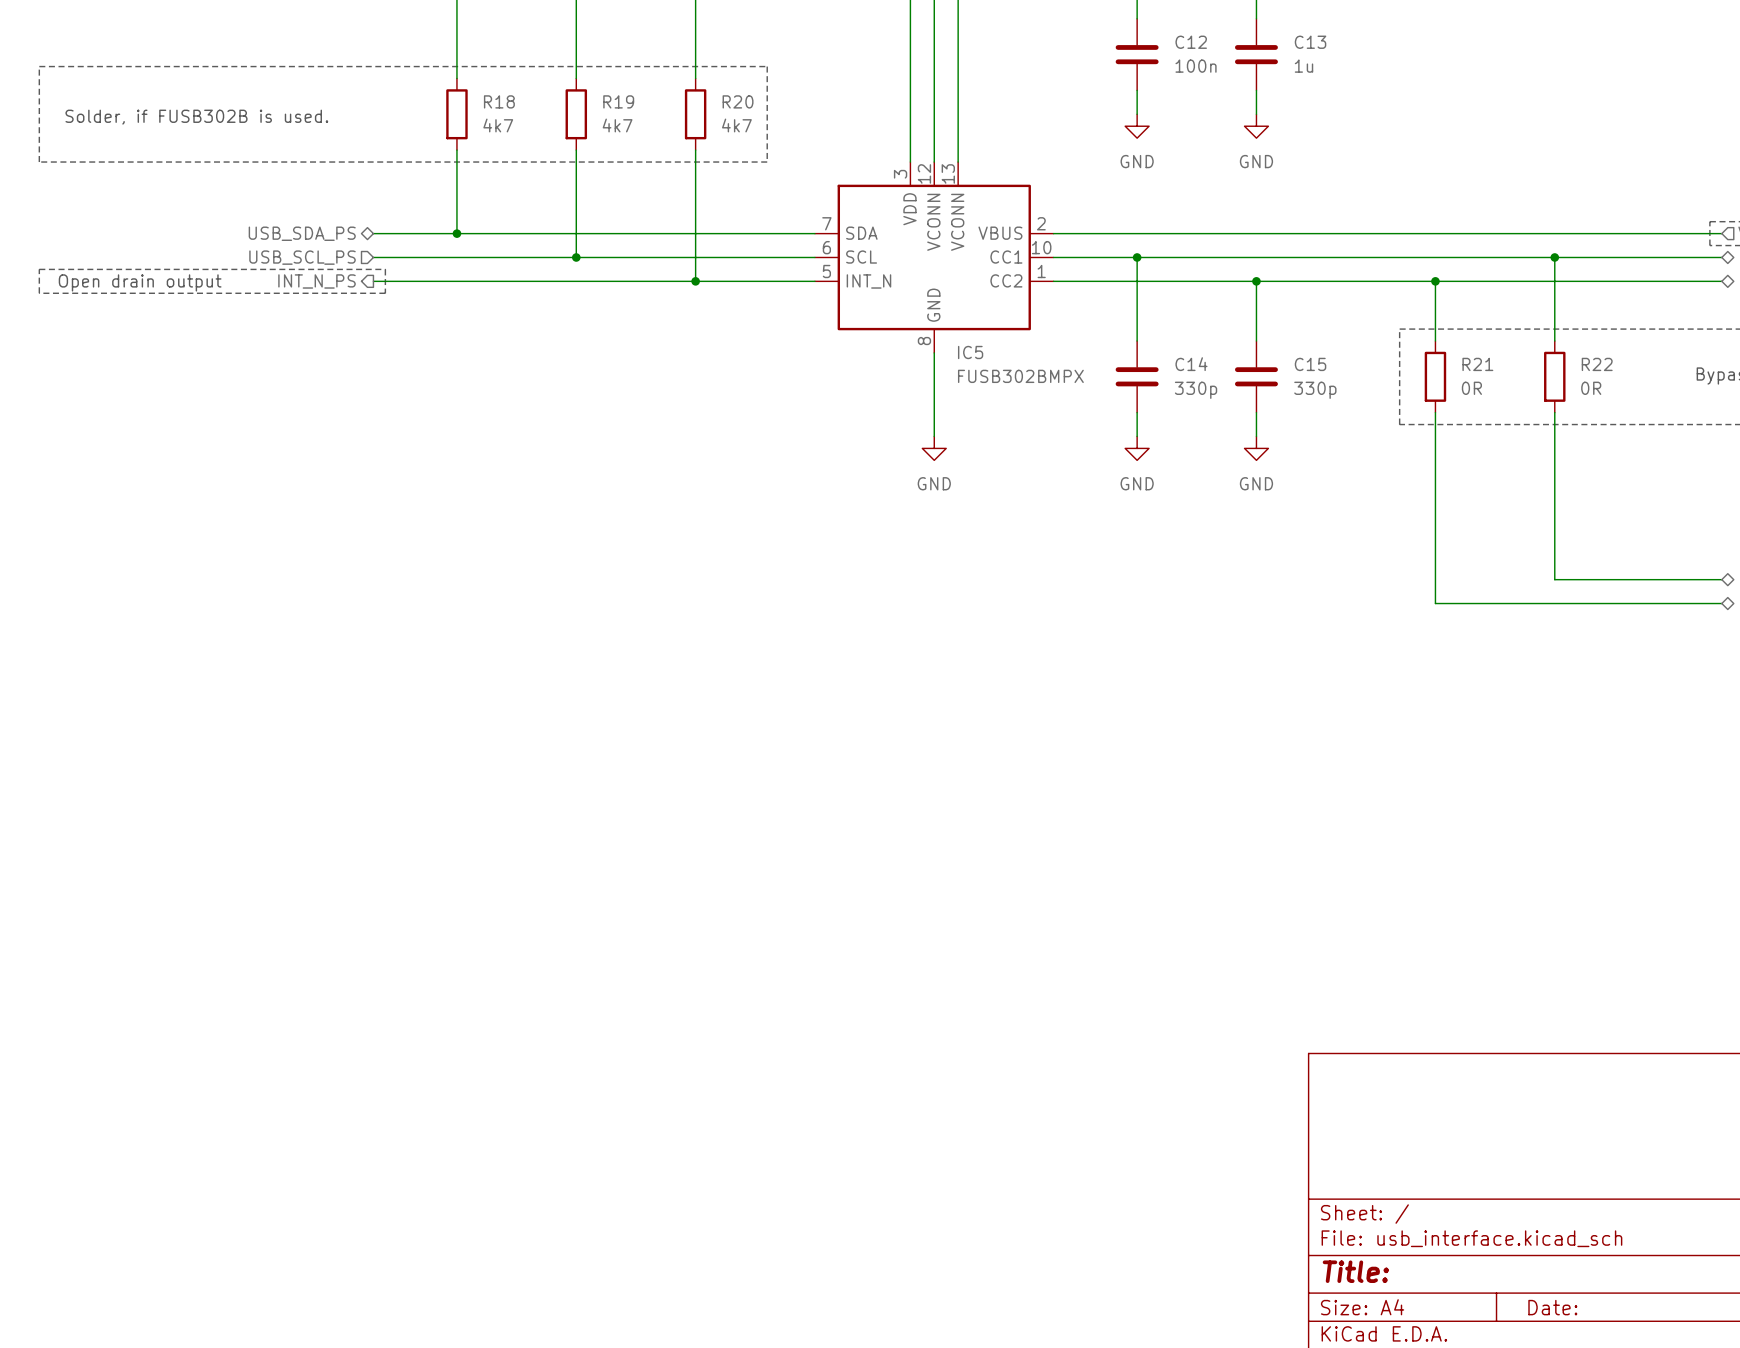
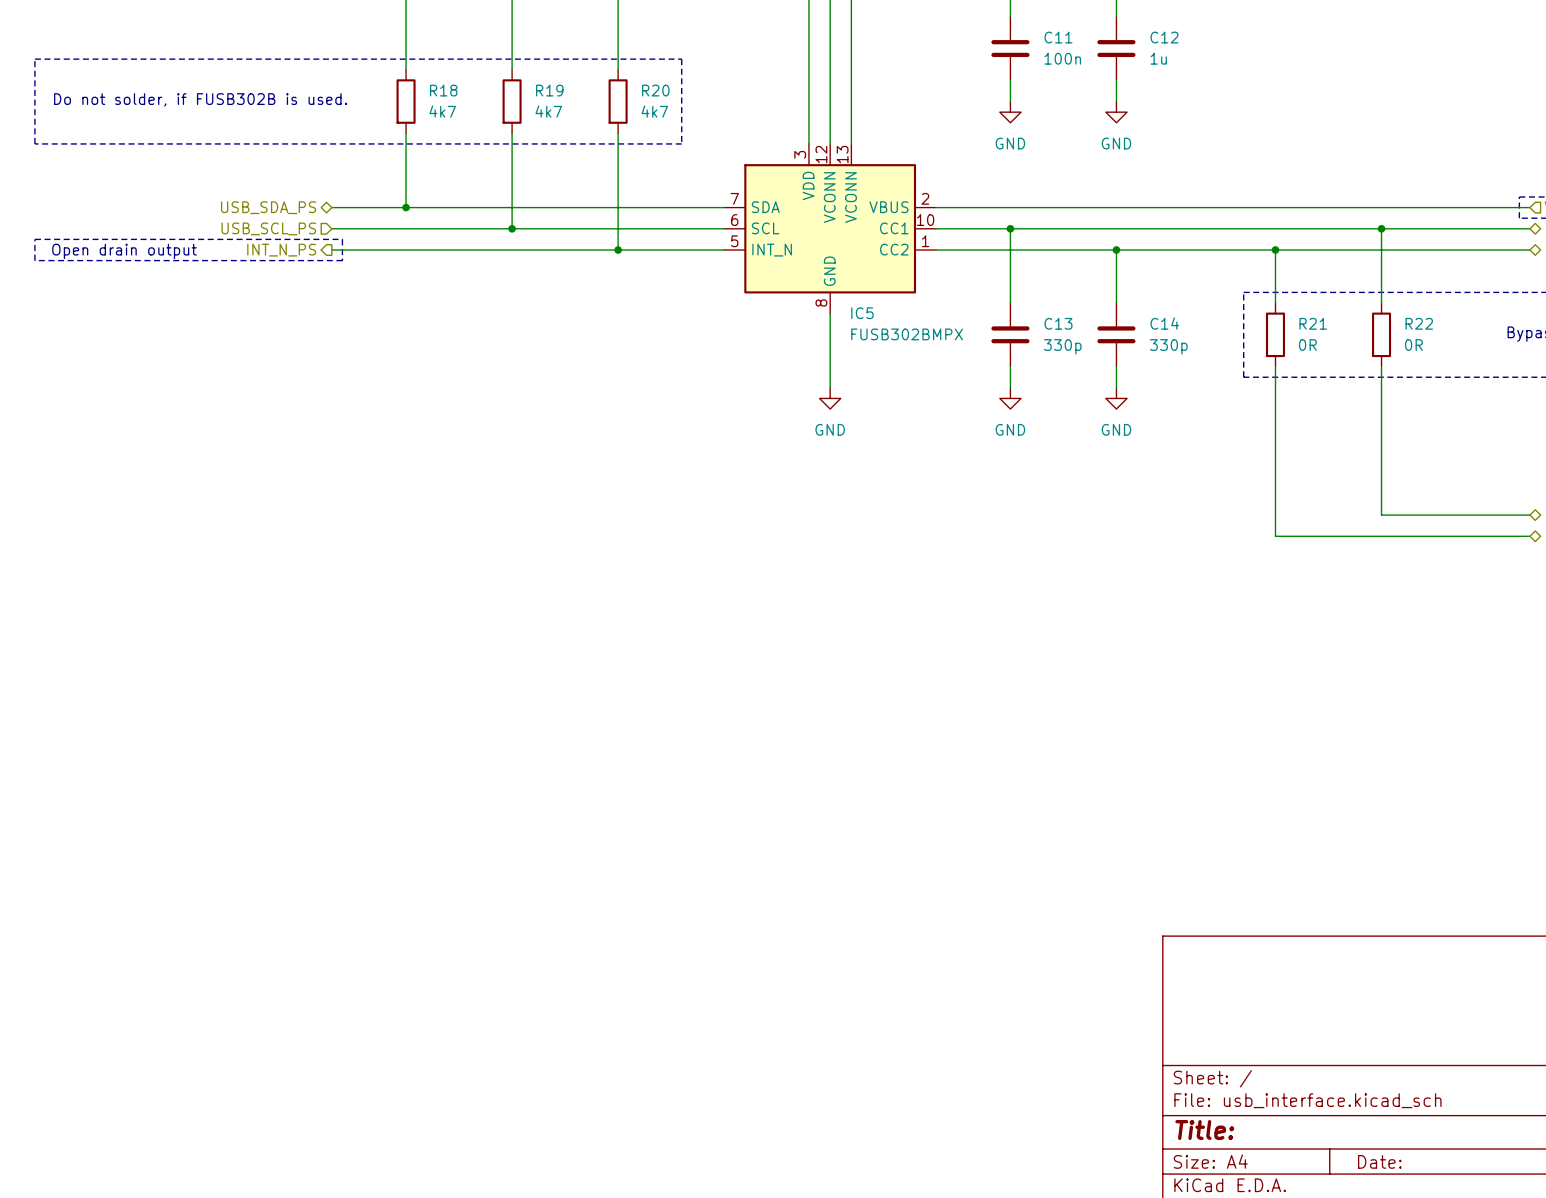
C12 name: C12 (1191, 42) -> C11 (1058, 37)
C13 name: C13 (1310, 42) -> C12 (1164, 37)
text: Solder, if FUSB302B is used. (196, 117) -> Do not solder, if FUSB302B is used. (200, 99)
C14 name: C14 (1191, 364) -> C13 (1058, 323)
C15 name: C15 (1310, 364) -> C14 (1164, 323)

